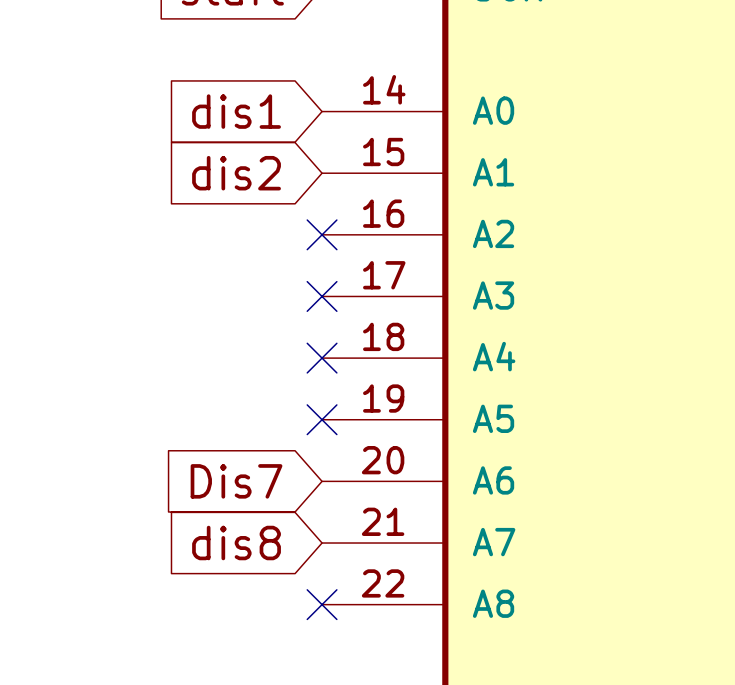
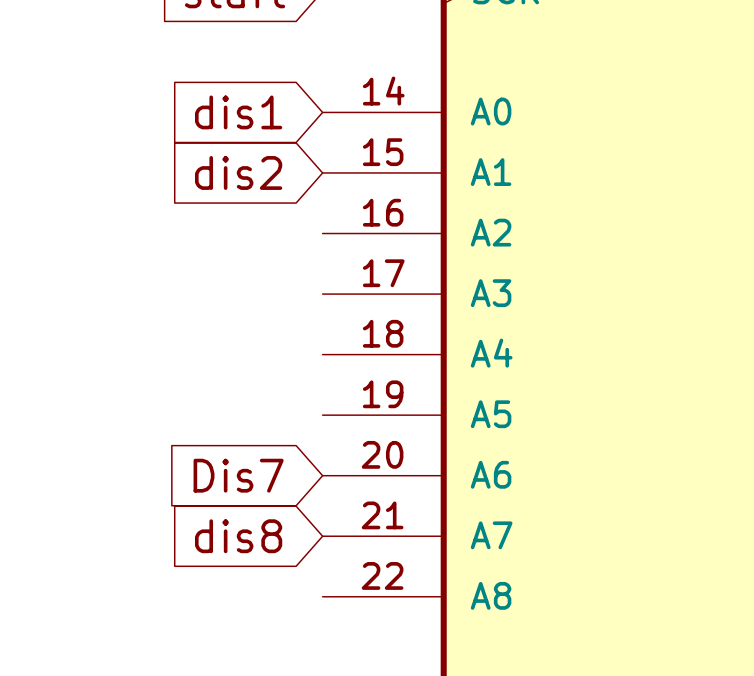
no-connect mark: (322, 234) -> none
no-connect mark: (322, 296) -> none
no-connect mark: (322, 358) -> none
no-connect mark: (322, 419) -> none
no-connect mark: (322, 604) -> none

